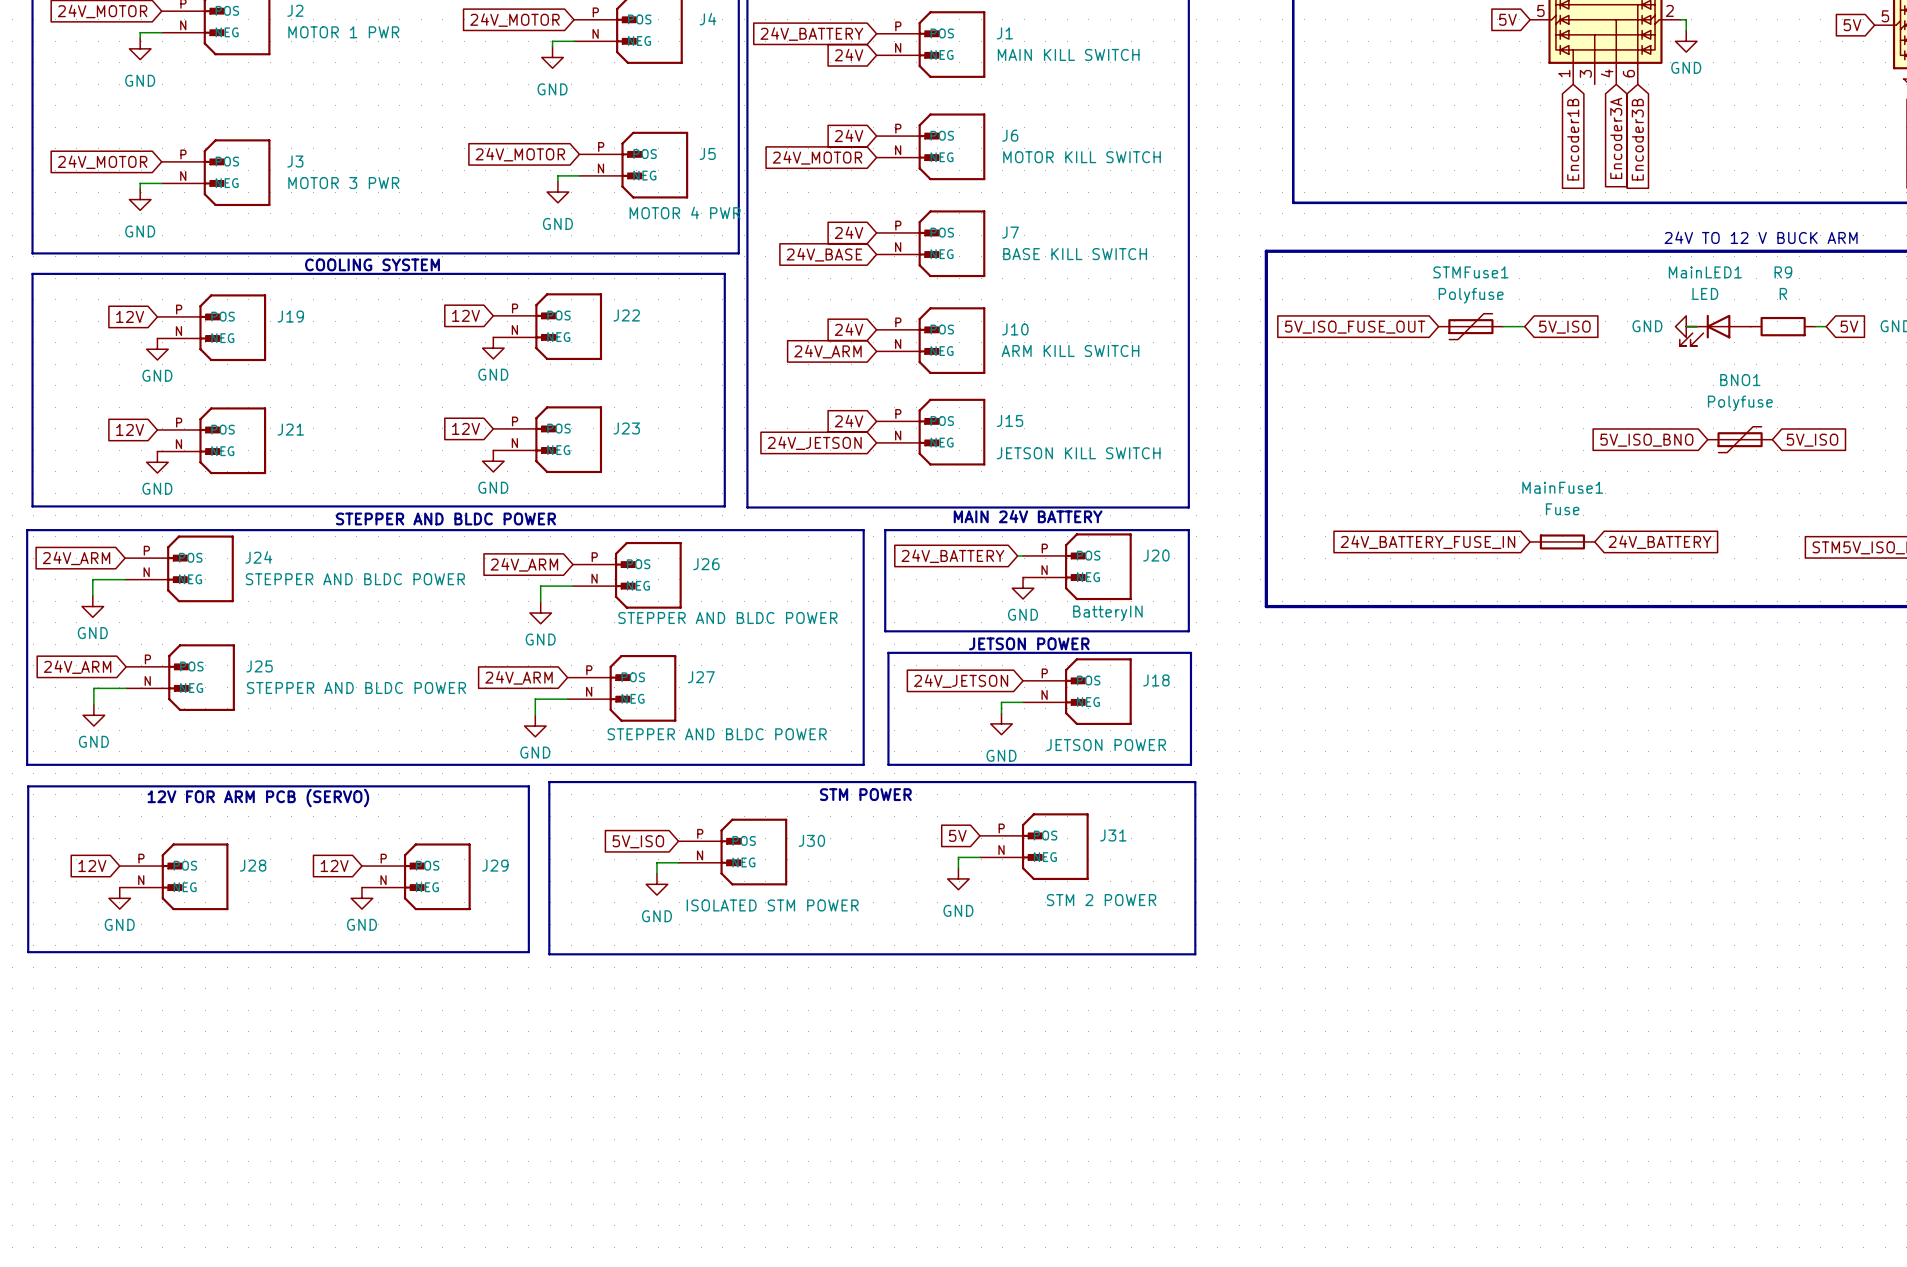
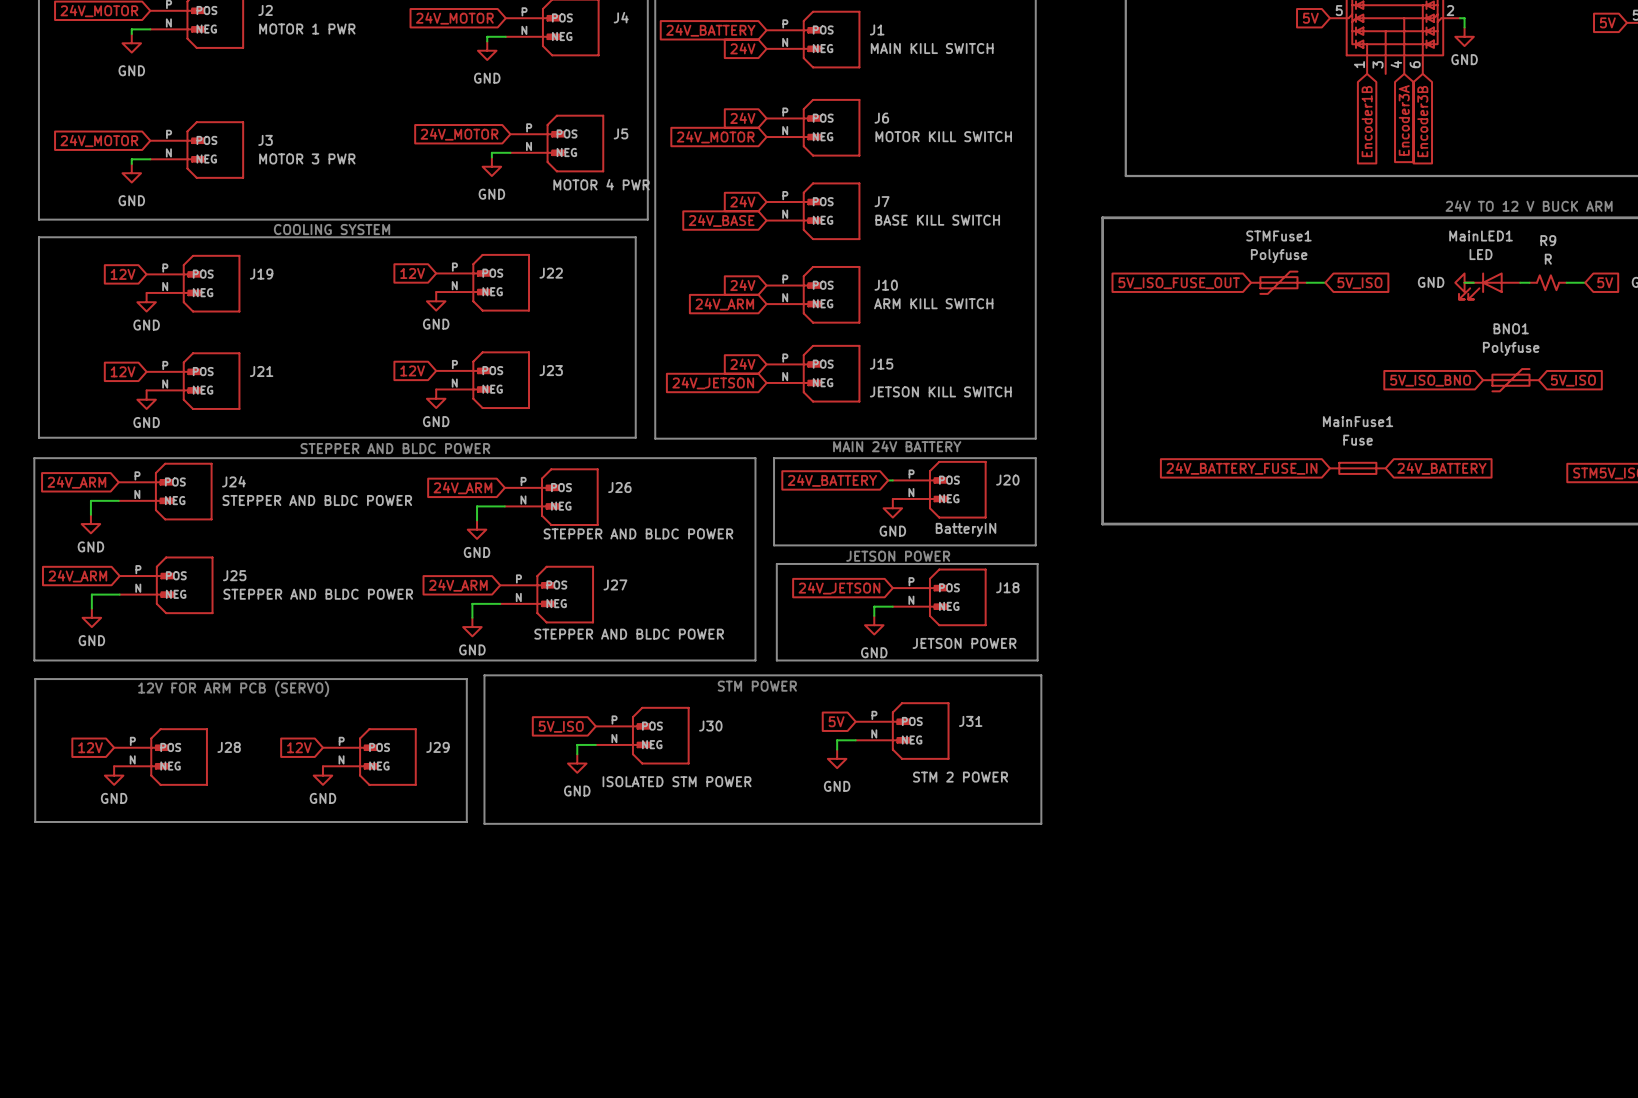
R9 symbol: [1750, 316, 1816, 337] -> [1529, 275, 1567, 291]

